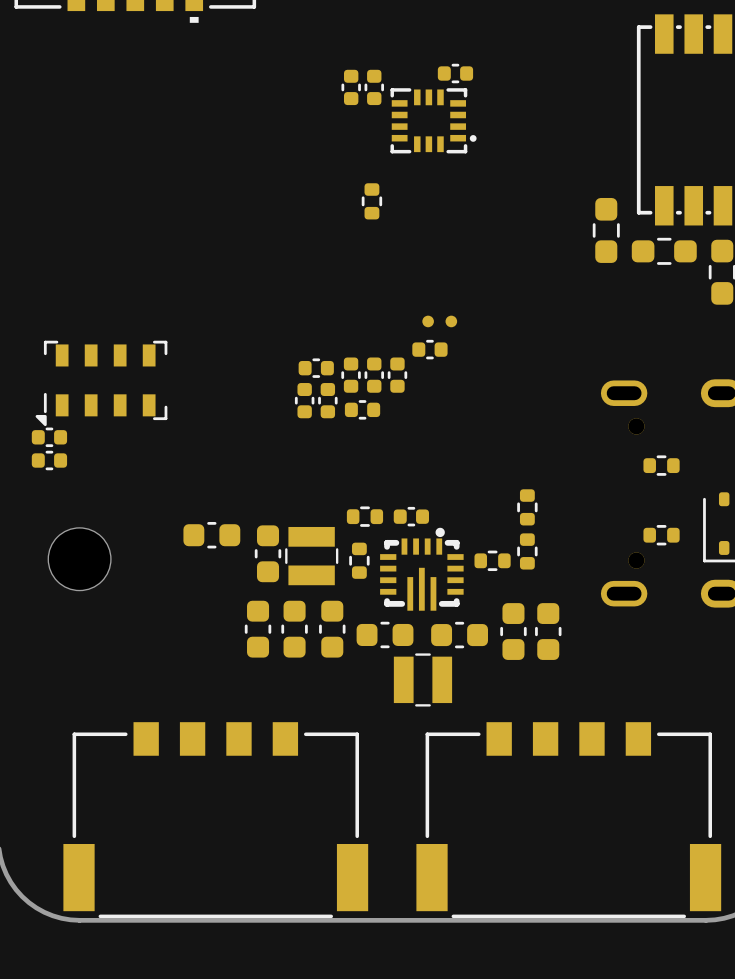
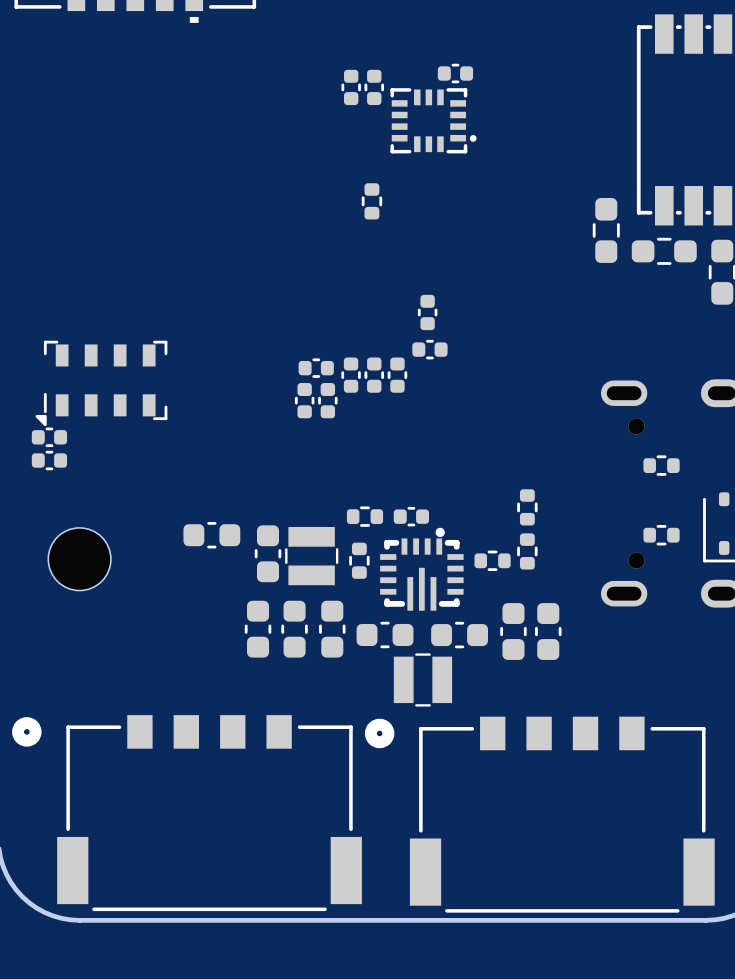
part footprint: [422, 315, 458, 328] -> [417, 294, 438, 331]
part: (362, 409) -> none
part: none -> (187, 813)
part: none -> (539, 814)
part: (215, 820) -> none
part: (568, 820) -> none

